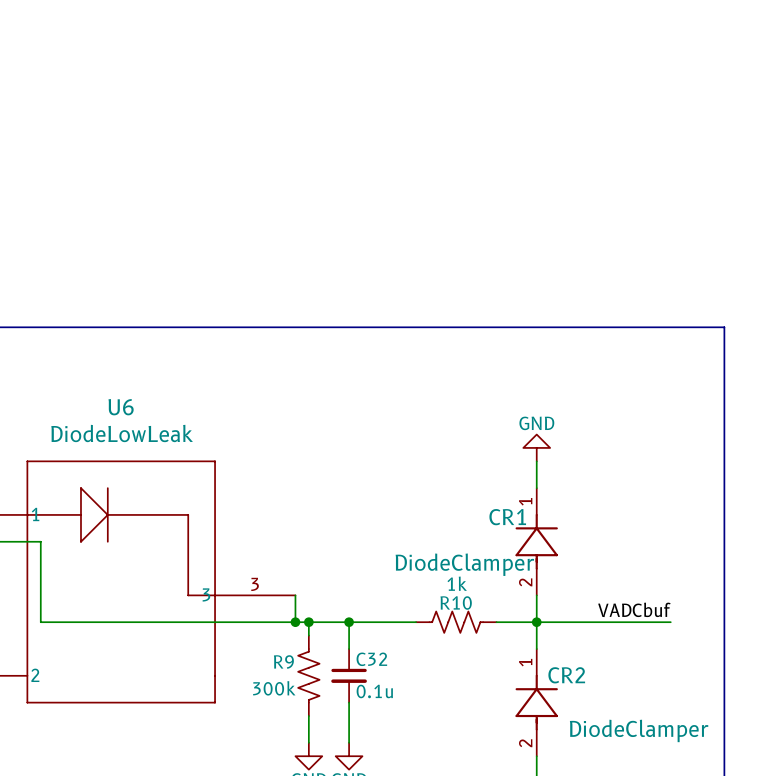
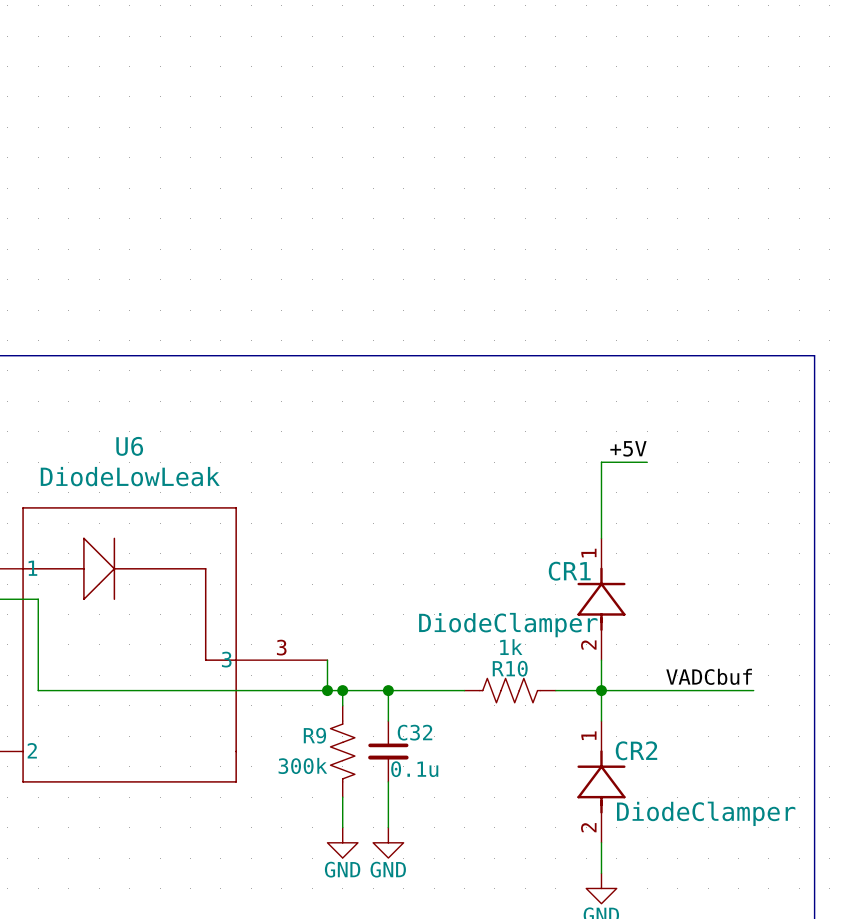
label: none -> +5V (628, 448)
wire: none -> (647, 462) (601, 462) (601, 507)
power symbol: GND (536, 447) -> none

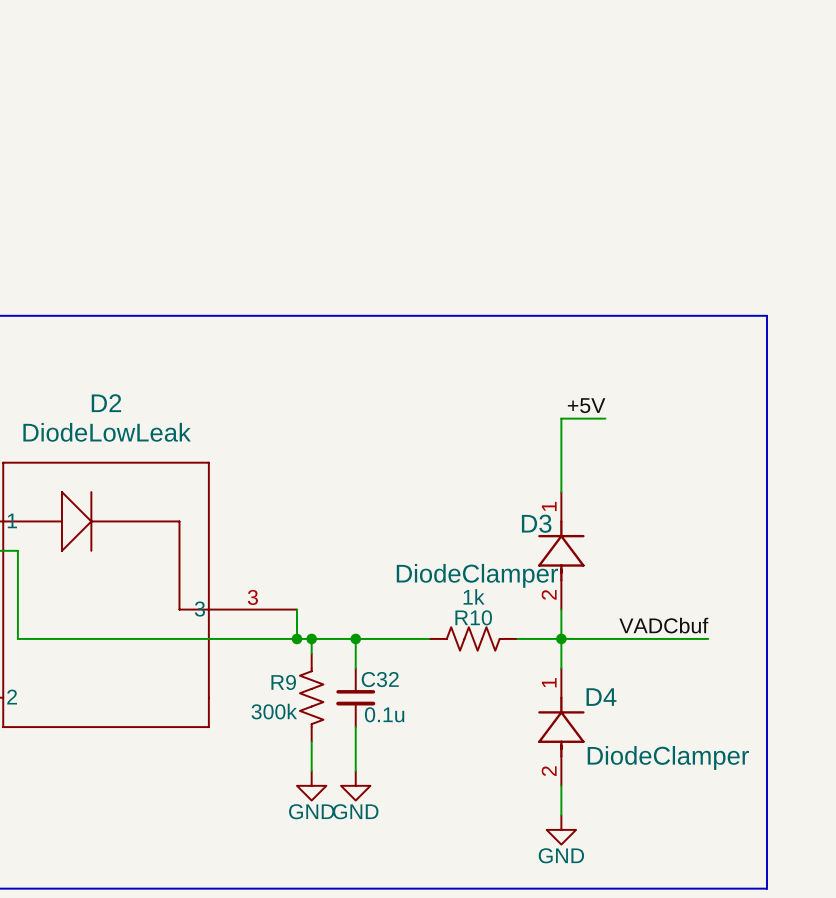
U6 name: U6 (129, 446) -> D2 (106, 403)
CR1 name: CR1 (569, 571) -> D3 (536, 523)
CR2 name: CR2 (636, 750) -> D4 (601, 697)

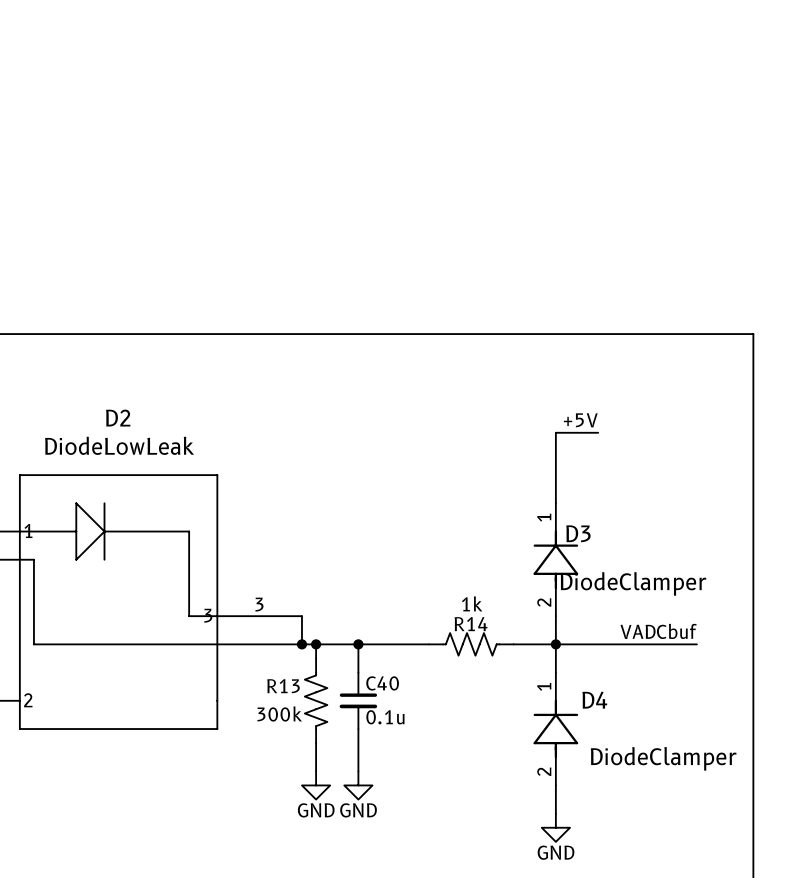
D3 name position: D3 (536, 523) -> D3 (578, 533)
D3 value position: DiodeClamper (477, 575) -> DiodeClamper (633, 583)
R10 name: R10 (473, 617) -> R14 (471, 624)
C32 name: C32 (380, 679) -> C40 (382, 683)
R9 name: R9 (283, 682) -> R13 (283, 686)

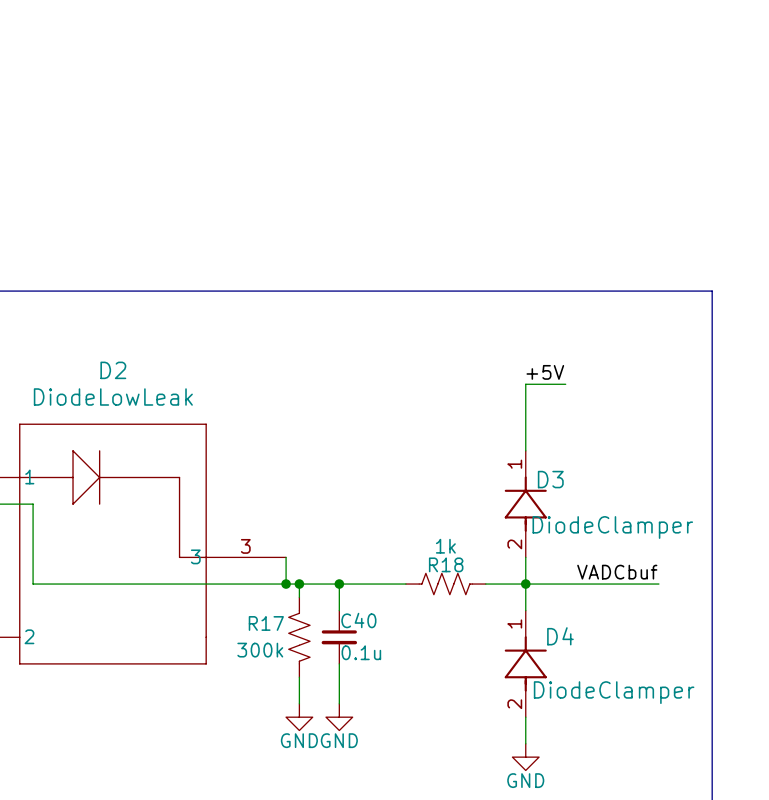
R14 name: R14 (471, 624) -> R18 (446, 564)
R13 name: R13 (283, 686) -> R17 (266, 623)

